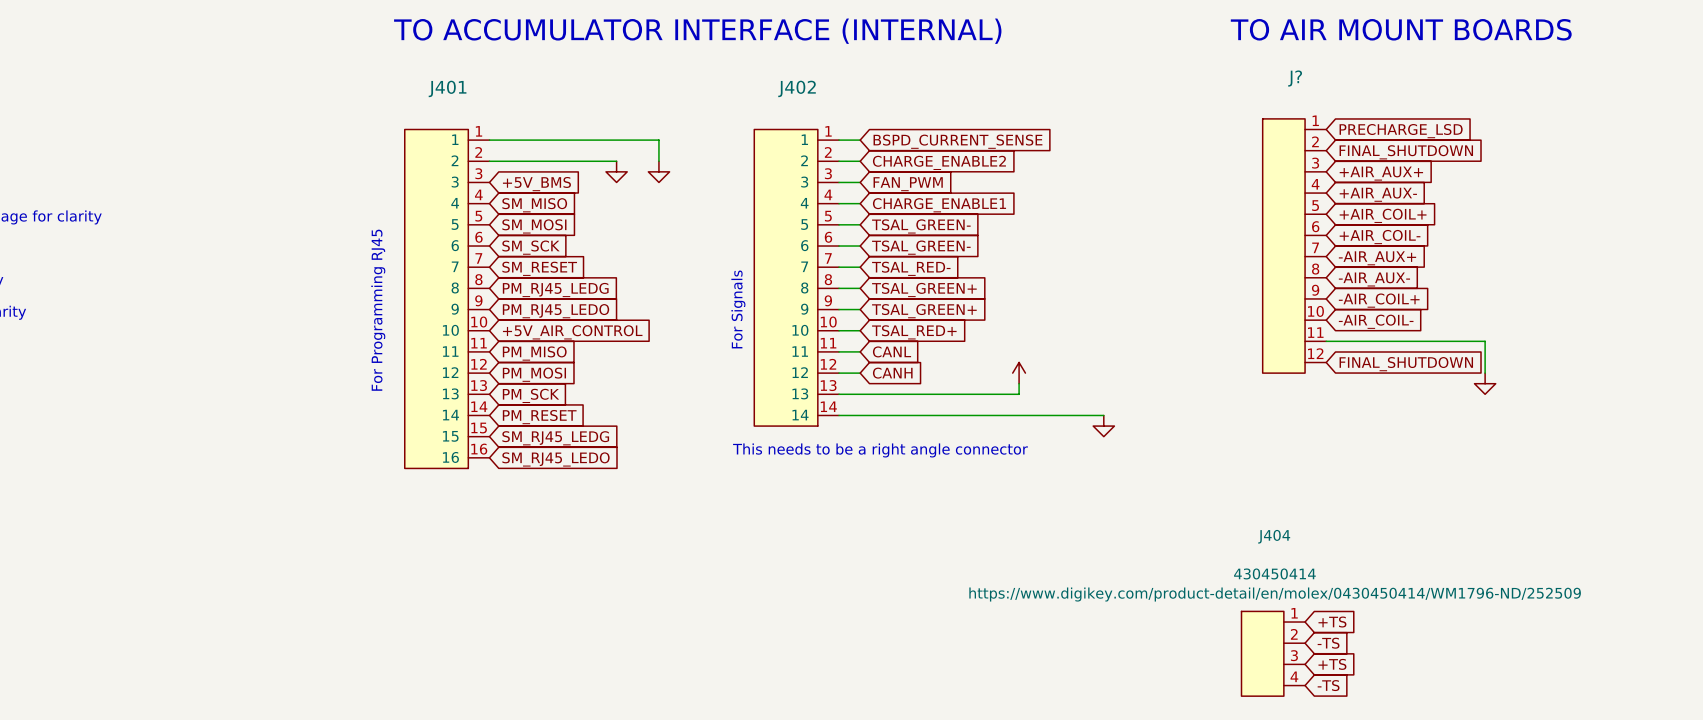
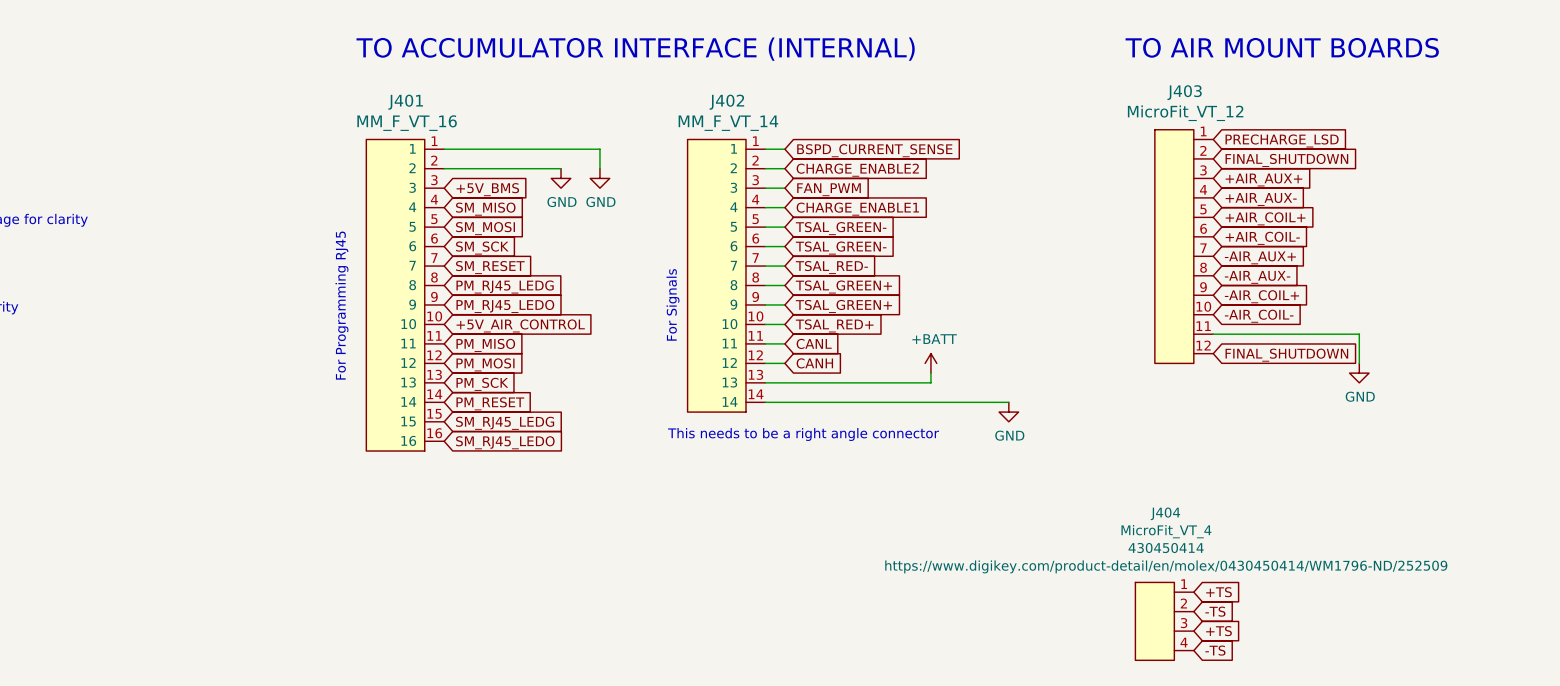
J? name: J? (1295, 78) -> J403 (1184, 92)
J? value: none -> MicroFit_VT_12 (1185, 113)
J401 value: none -> MM_F_VT_16 (407, 123)
J402 value: none -> MM_F_VT_14 (728, 123)
power symbol text: none -> GND (561, 202)
power symbol text: none -> GND (600, 202)
power symbol text: none -> +BATT (934, 339)
power symbol text: none -> GND (1360, 396)
power symbol text: none -> GND (1009, 435)
J404 value: none -> MicroFit_VT_4 (1166, 531)

